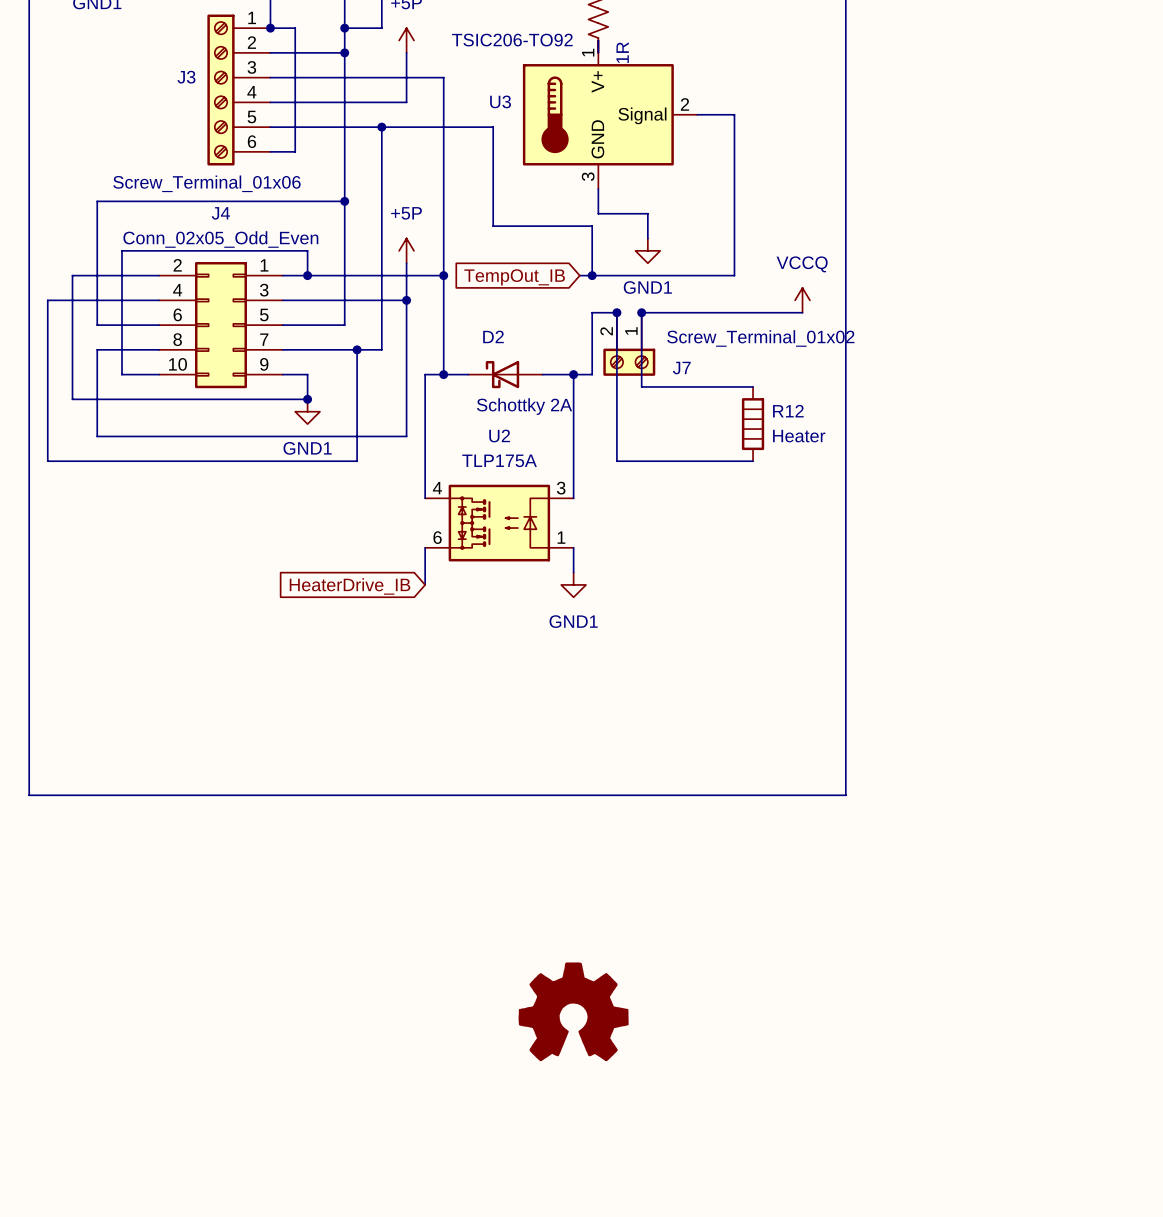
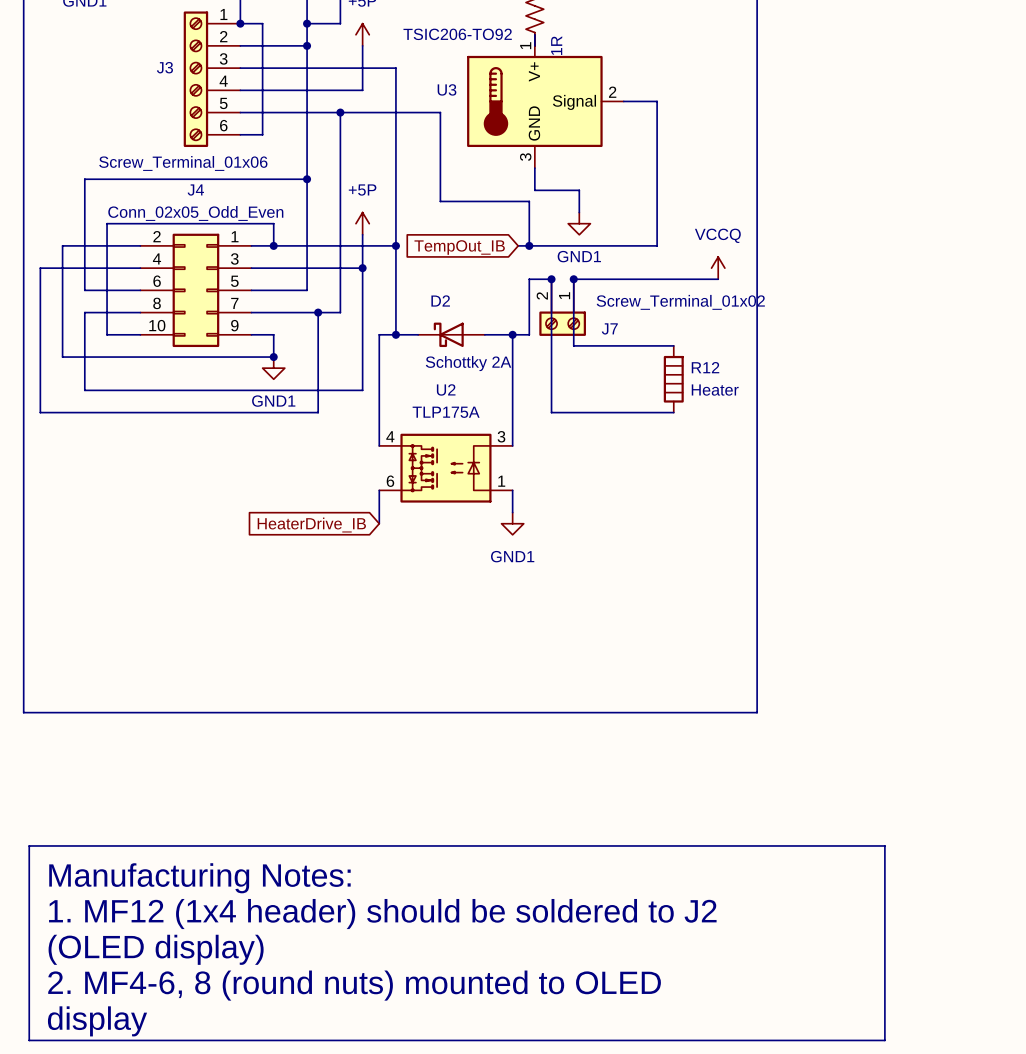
line: none -> (29, 845) (884, 845) (884, 1040) (29, 1040) (29, 845)
text: none -> Manufacturing Notes: (199, 878)
part: (573, 1011) -> none
text: none -> 1. MF12 (1x4 header) should be soldered to J2 (382, 914)
text: none -> (OLED display) (156, 949)
text: none -> 2. MF4-6, 8 (round nuts) mounted to OLED (354, 985)
text: none -> display (97, 1021)

